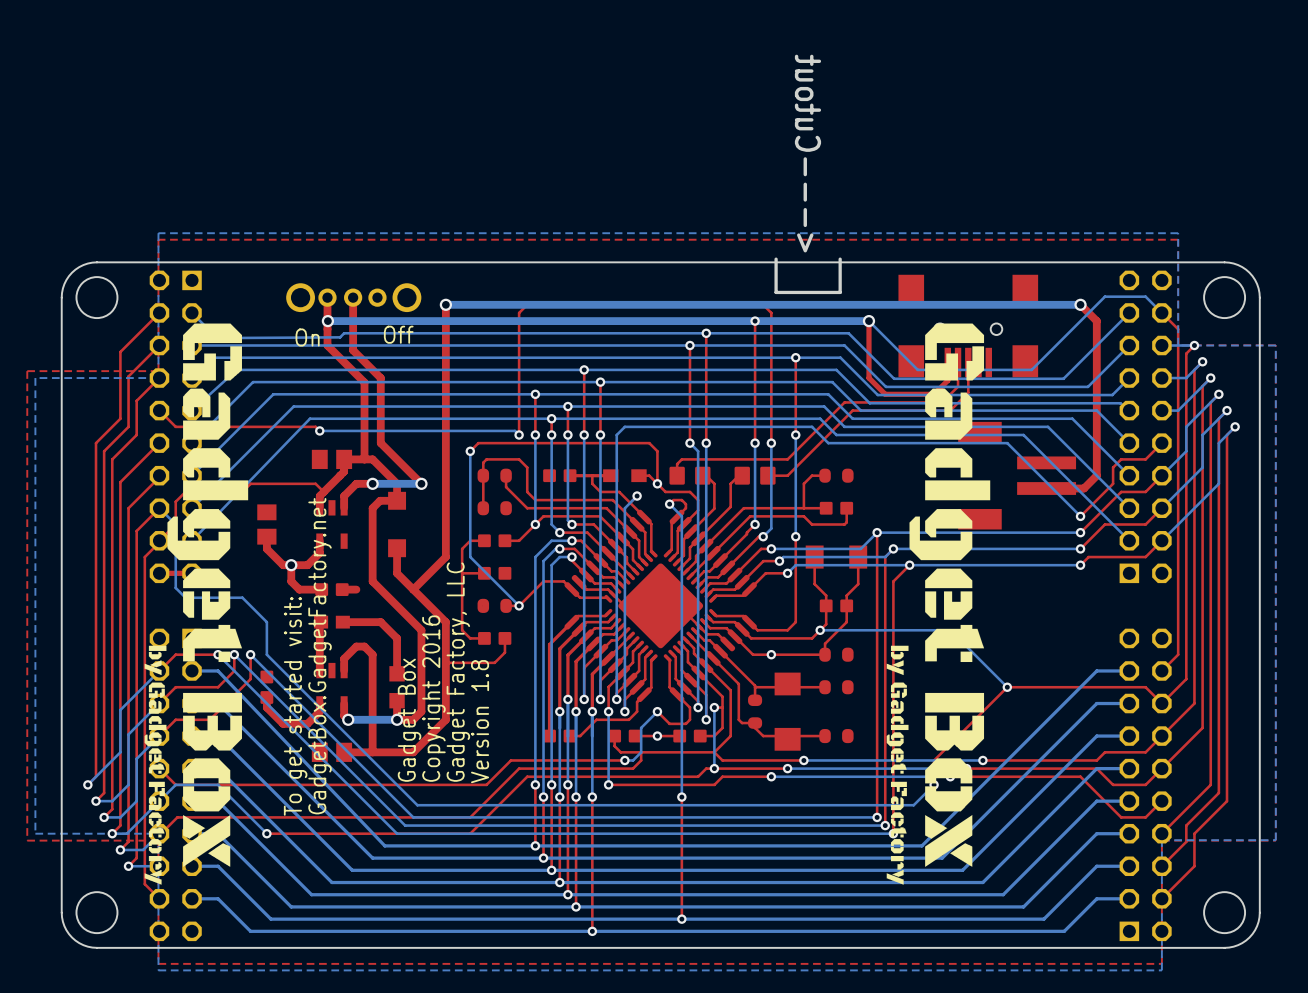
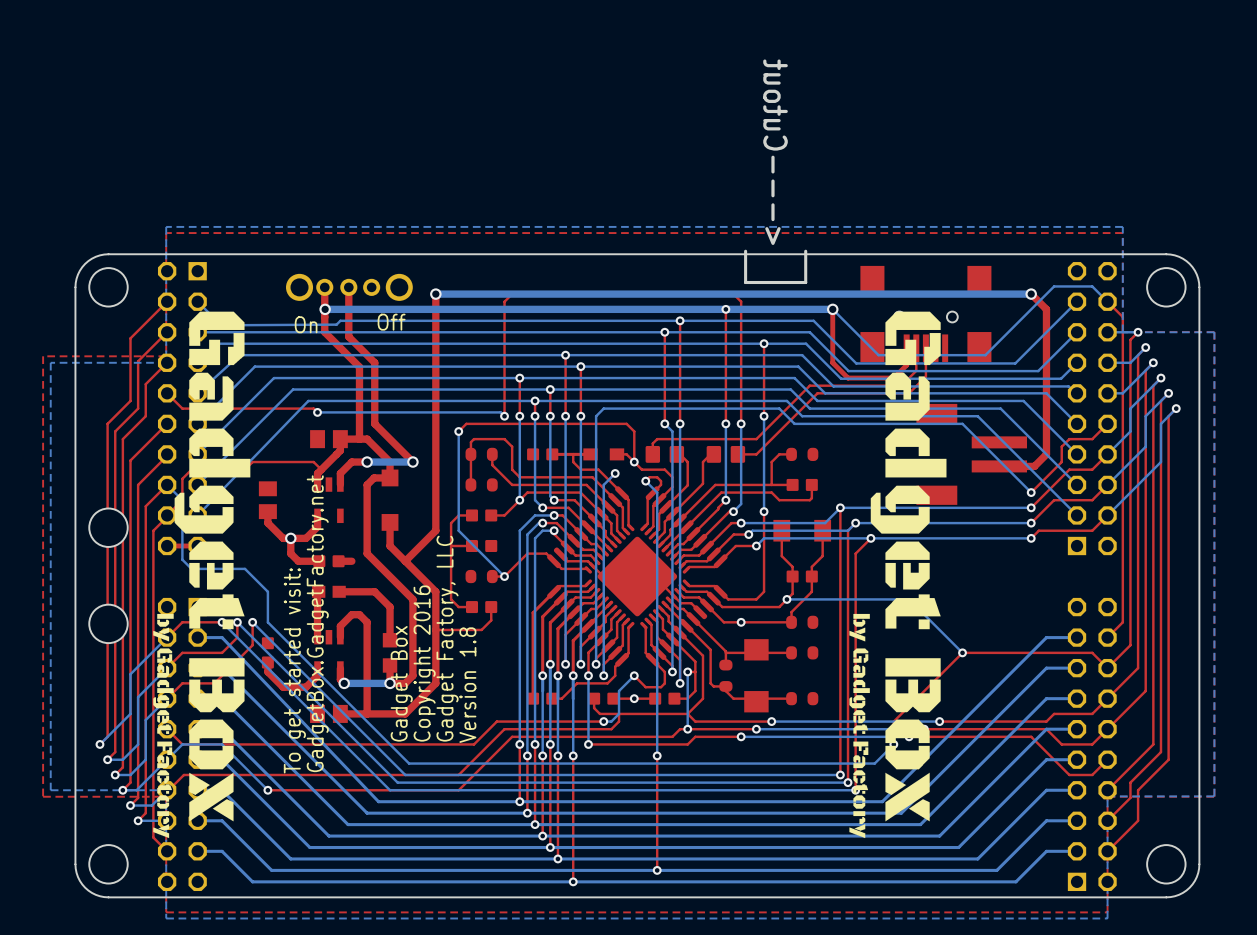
part footprint: [61, 262, 1260, 948] -> [75, 254, 1200, 898]

